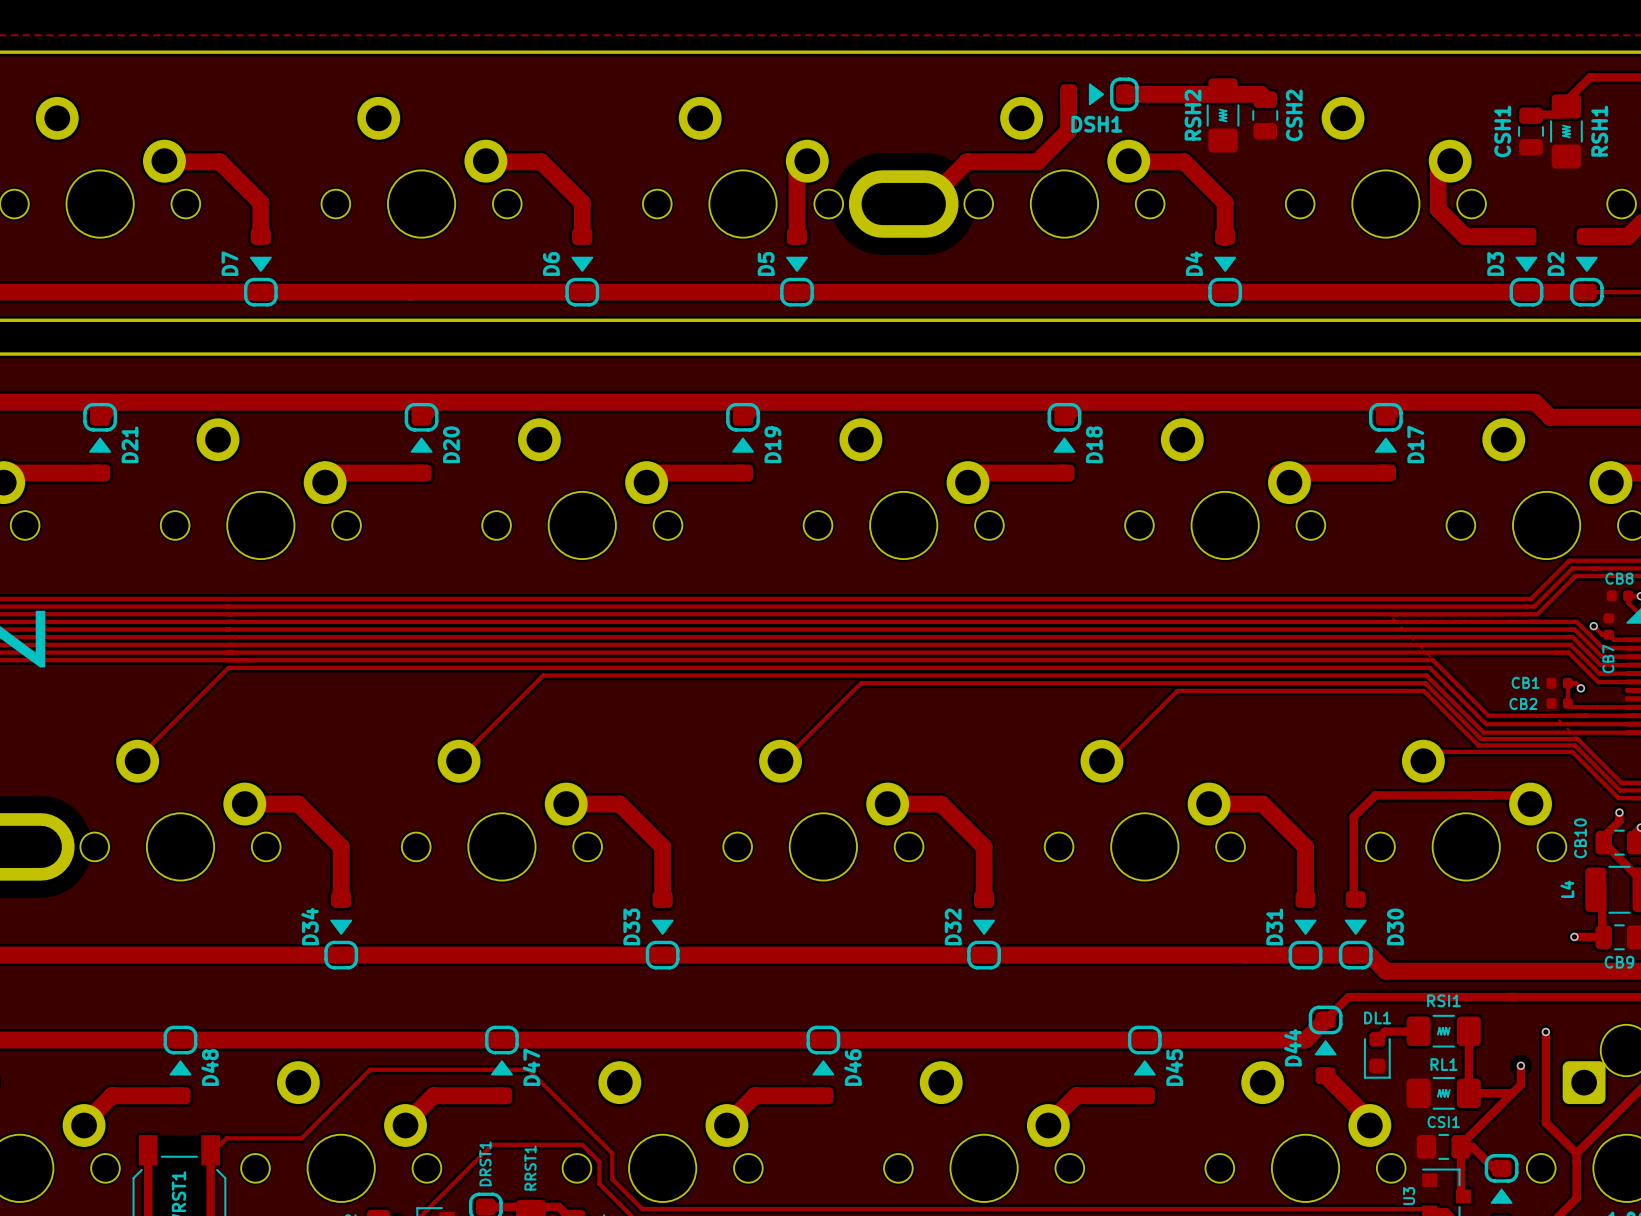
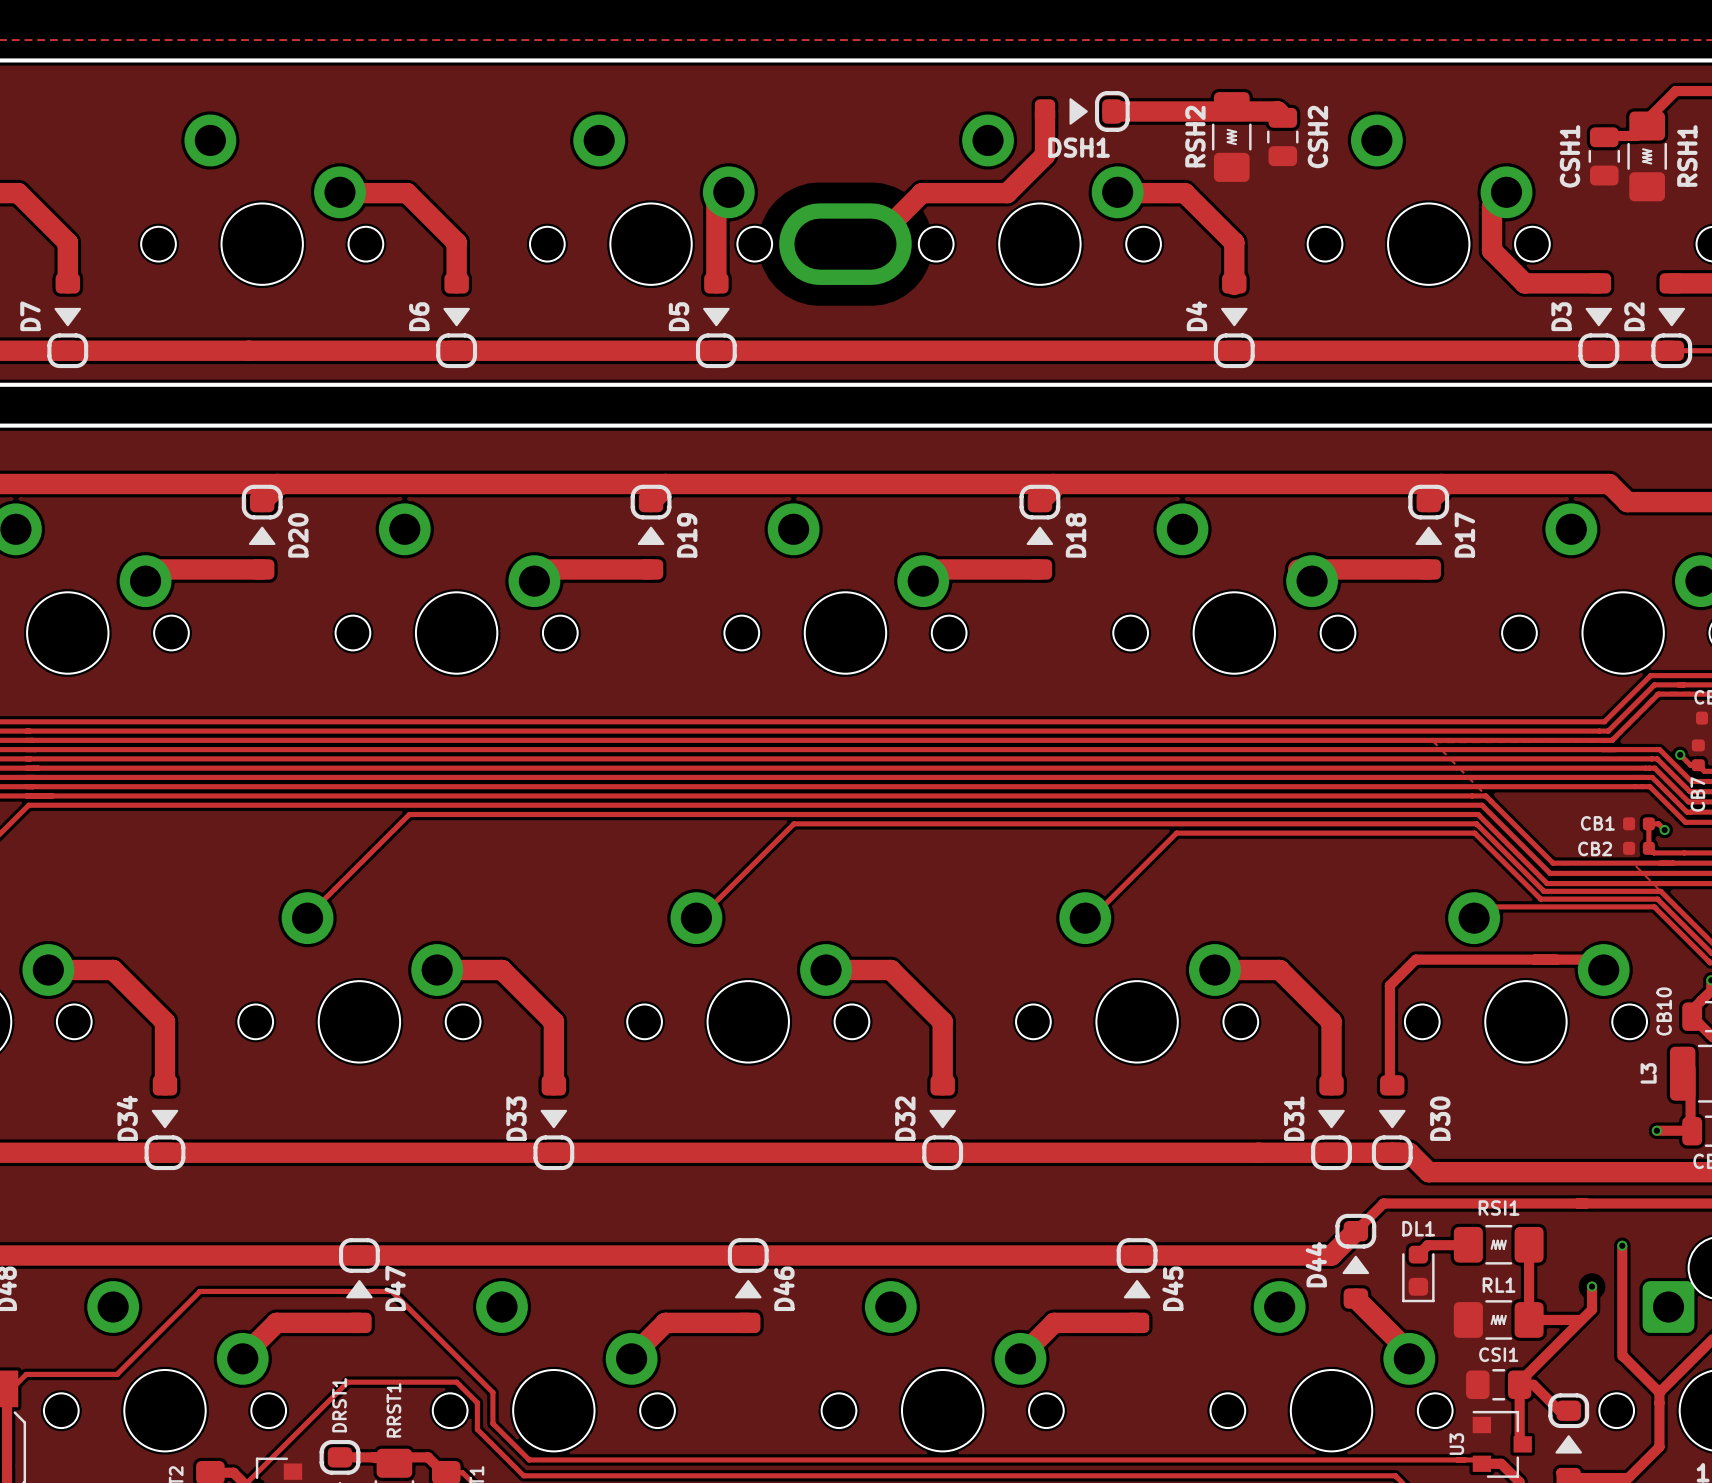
L4 name: L4 (1567, 889) -> L3 (1648, 1073)

